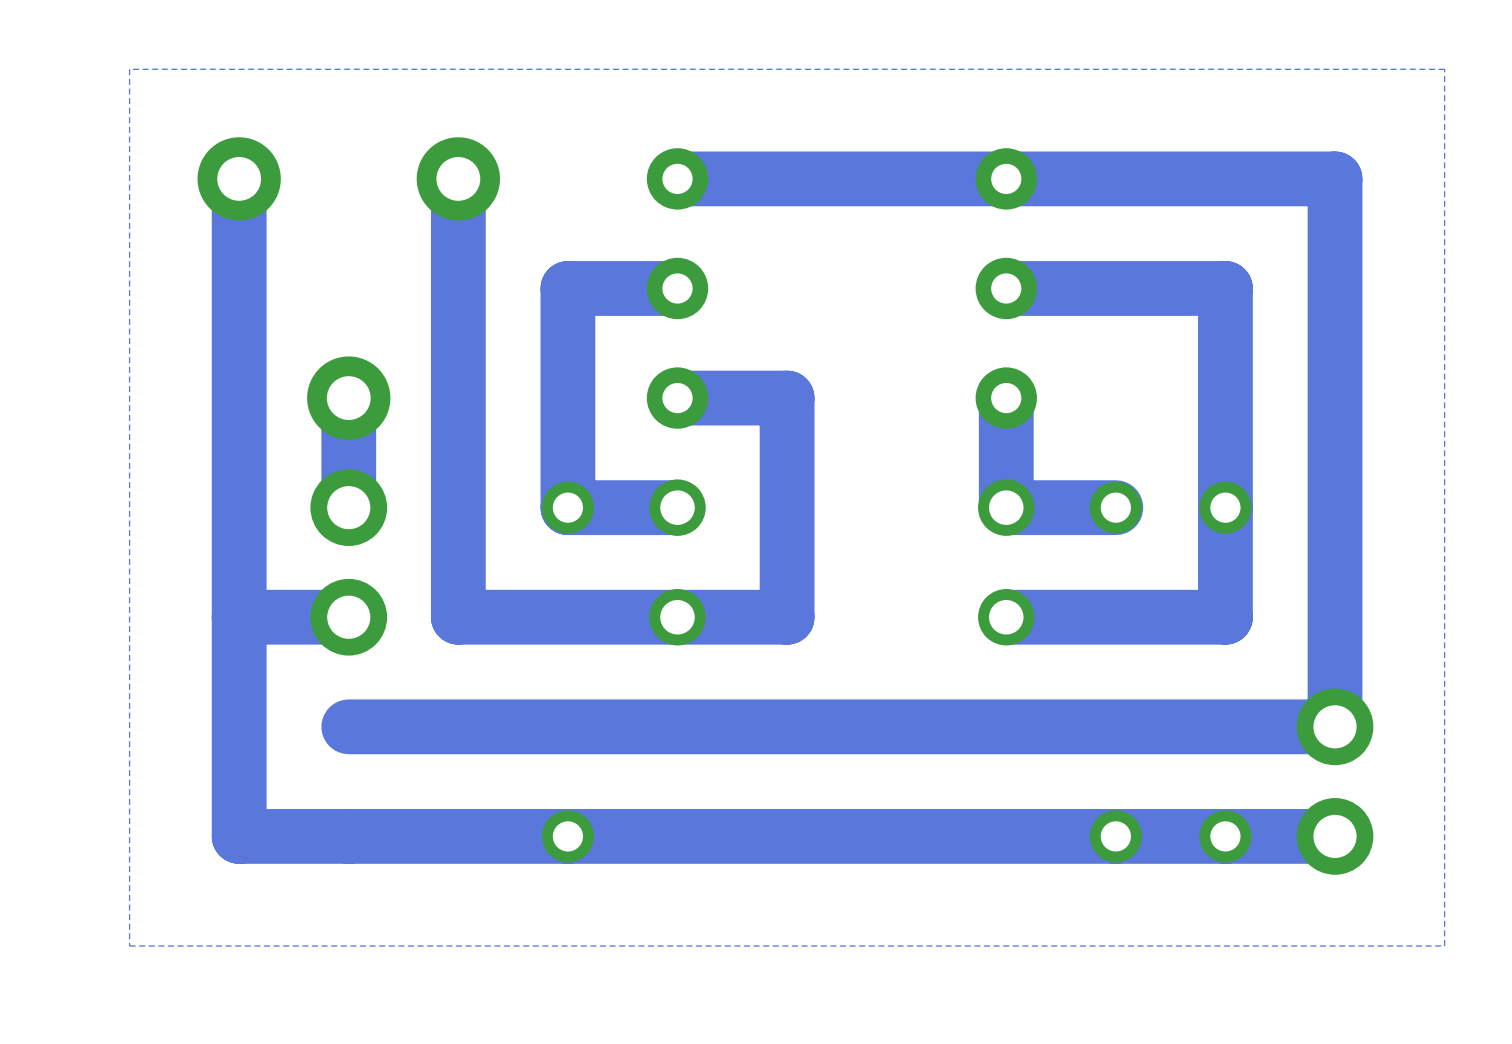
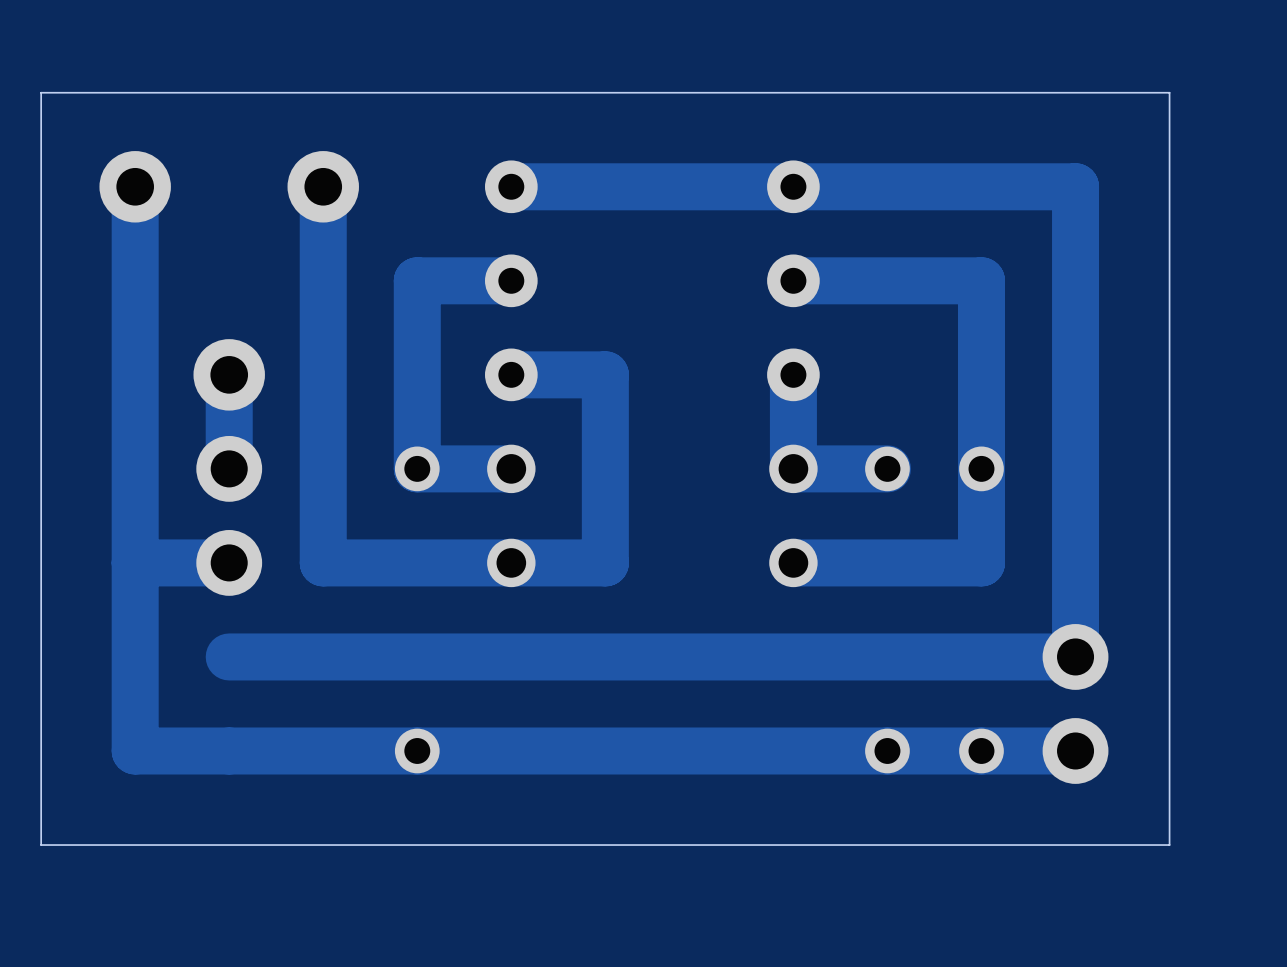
zone outline: (1444, 69) (129, 69) (129, 945) (1444, 945) (1444, 69) -> none
board edge: none -> (1169, 92) (41, 92) (41, 845) (1169, 845) (1169, 92)

